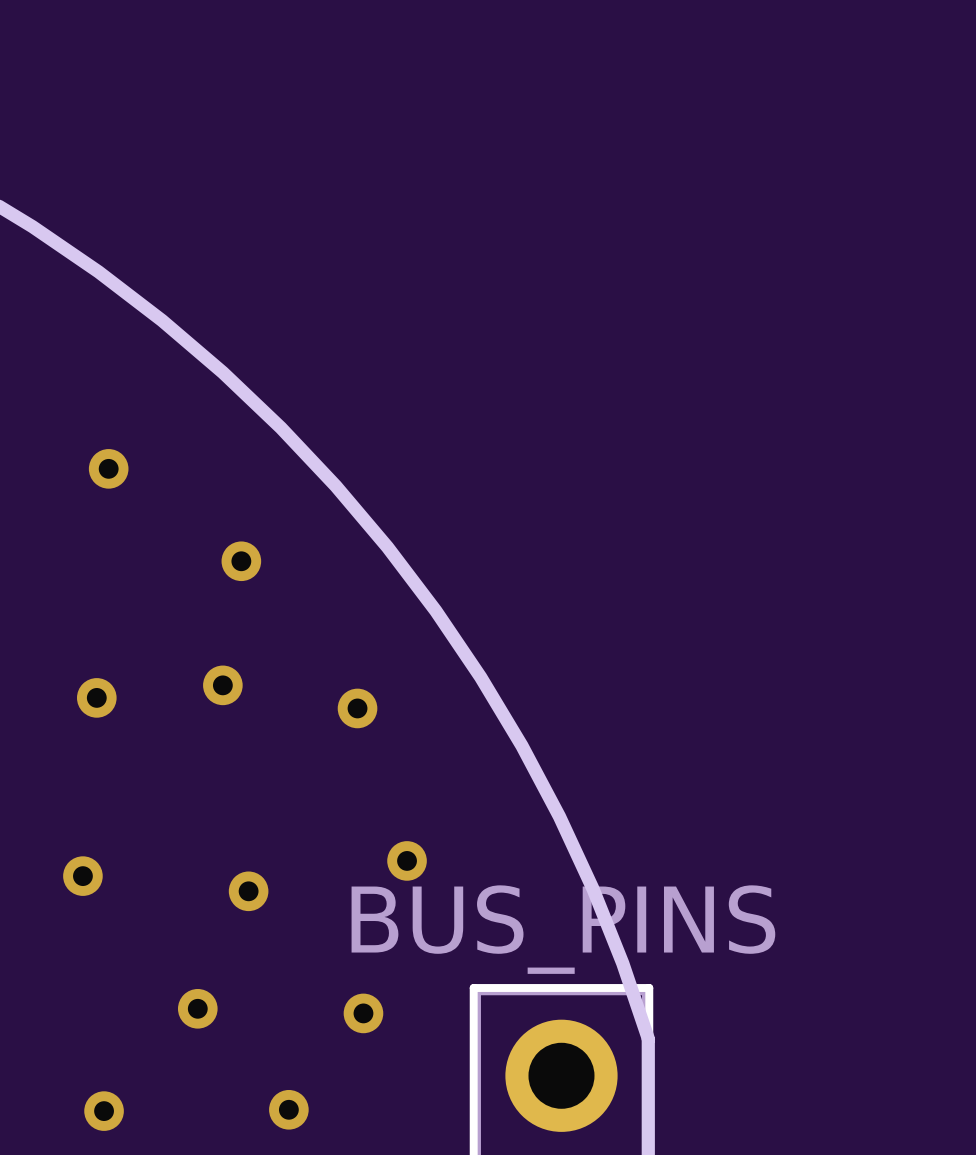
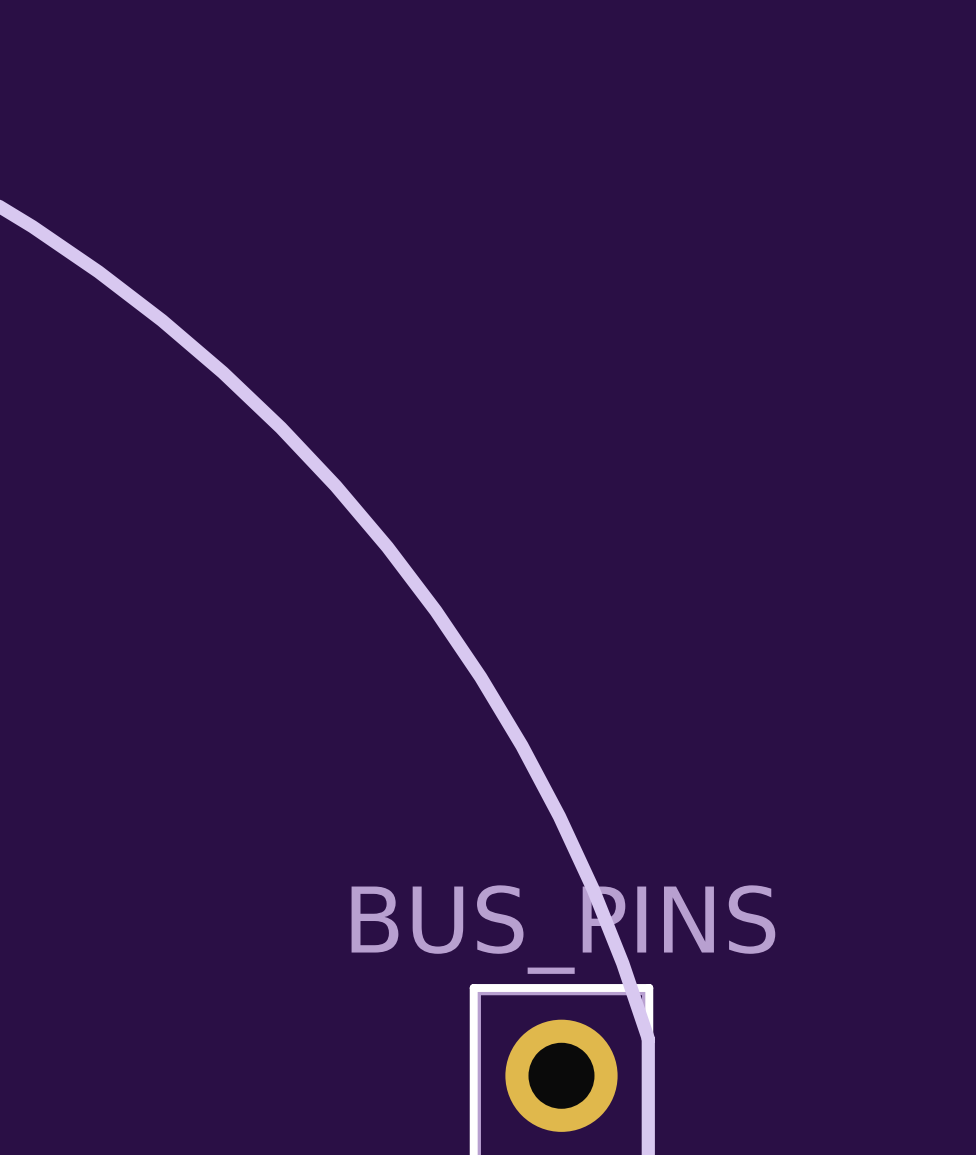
via: (108, 468) -> none
via: (241, 561) -> none
via: (222, 685) -> none
via: (96, 697) -> none
via: (357, 708) -> none
via: (407, 860) -> none
via: (82, 876) -> none
via: (248, 891) -> none
via: (197, 1008) -> none
via: (363, 1013) -> none
via: (288, 1109) -> none
via: (104, 1111) -> none

